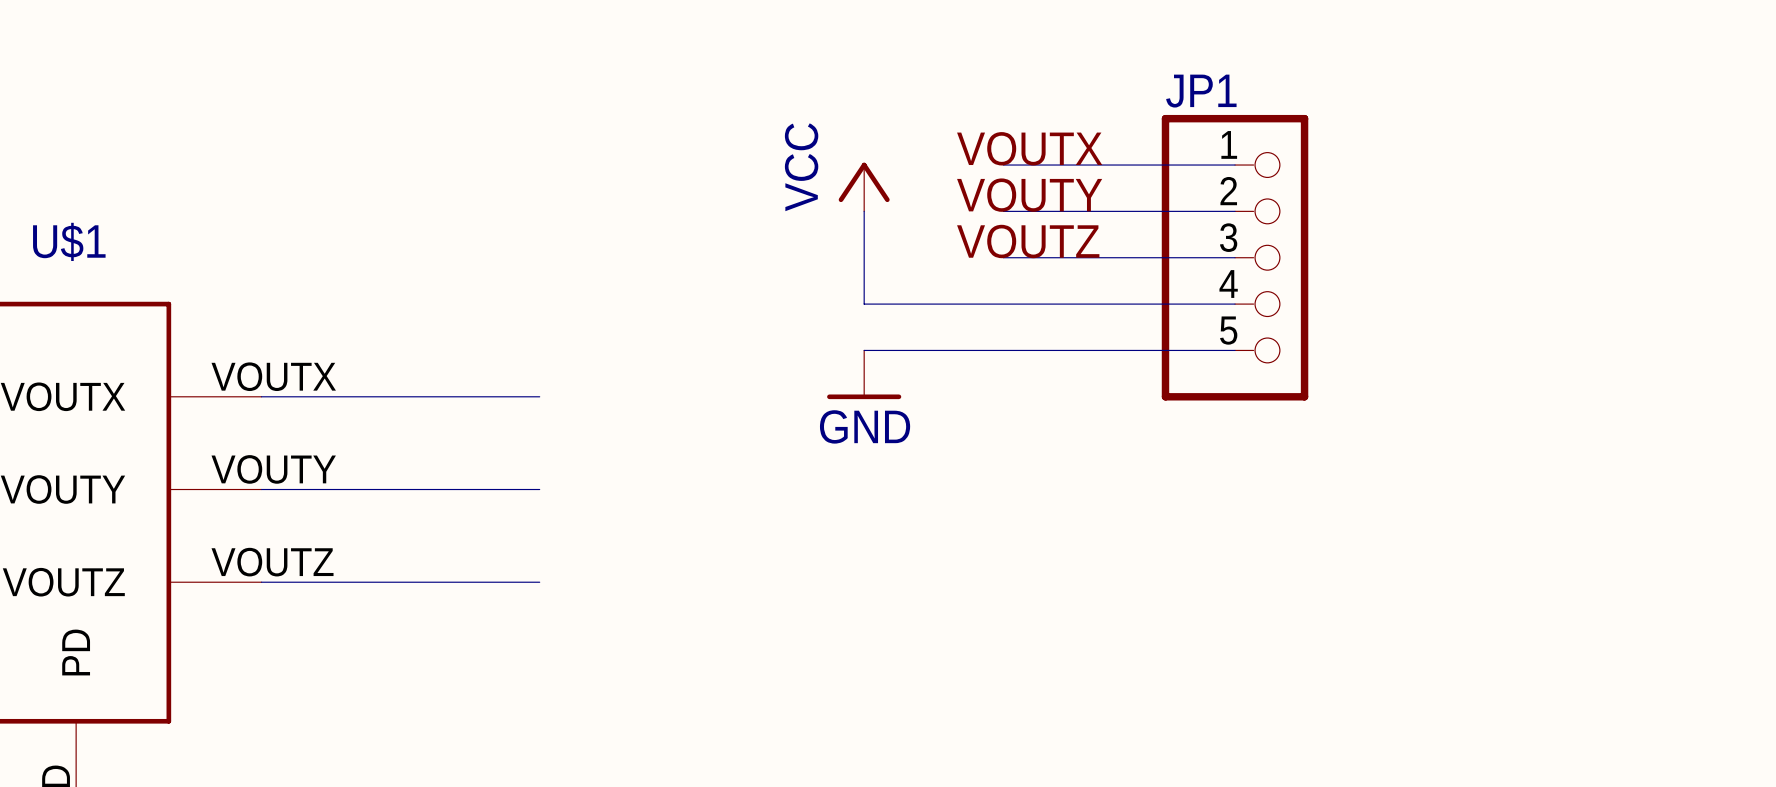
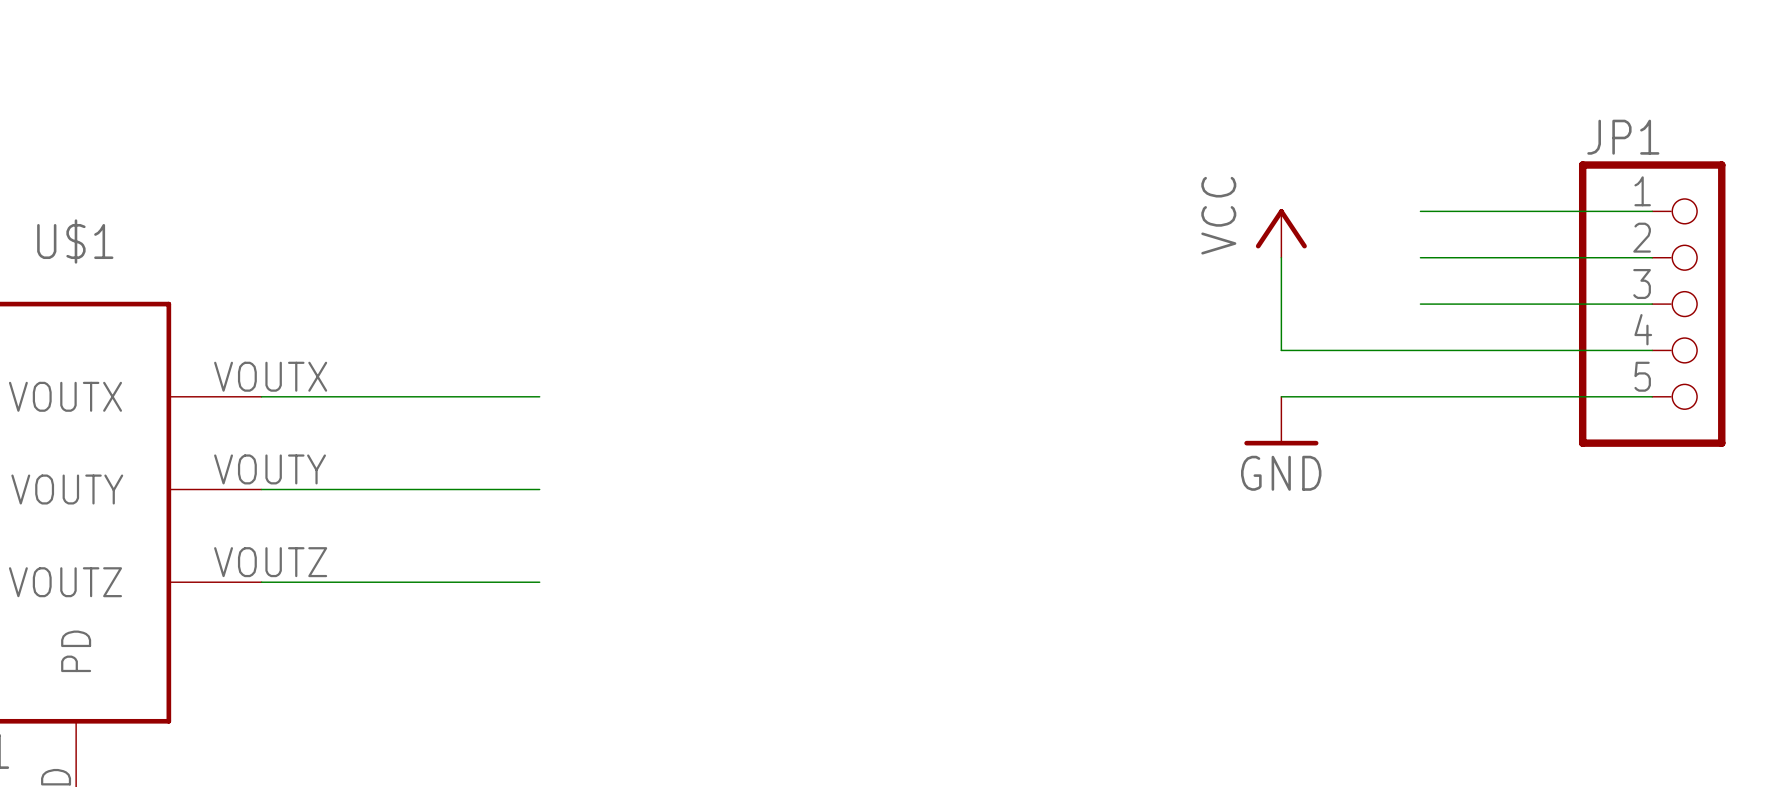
label: VOUTX (1029, 148) -> none
wire: (1003, 165) (1235, 165) -> (1420, 211) (1652, 211)
power symbol: VCC (864, 187) -> none
label: VOUTY (1029, 195) -> none
wire: (864, 211) (864, 304) (1235, 304) -> (1281, 257) (1281, 350) (1652, 350)
wire: (1003, 211) (1235, 211) -> (1420, 257) (1652, 257)
power symbol: none -> VCC (1281, 233)
label: VOUTZ (1028, 241) -> none
wire: (1003, 257) (1235, 257) -> (1420, 304) (1652, 304)
JP1 position: (1235, 257) -> (1652, 304)
wire: (864, 350) (1235, 350) -> (1281, 396) (1652, 396)
power symbol position: GND (864, 374) -> GND (1281, 421)

